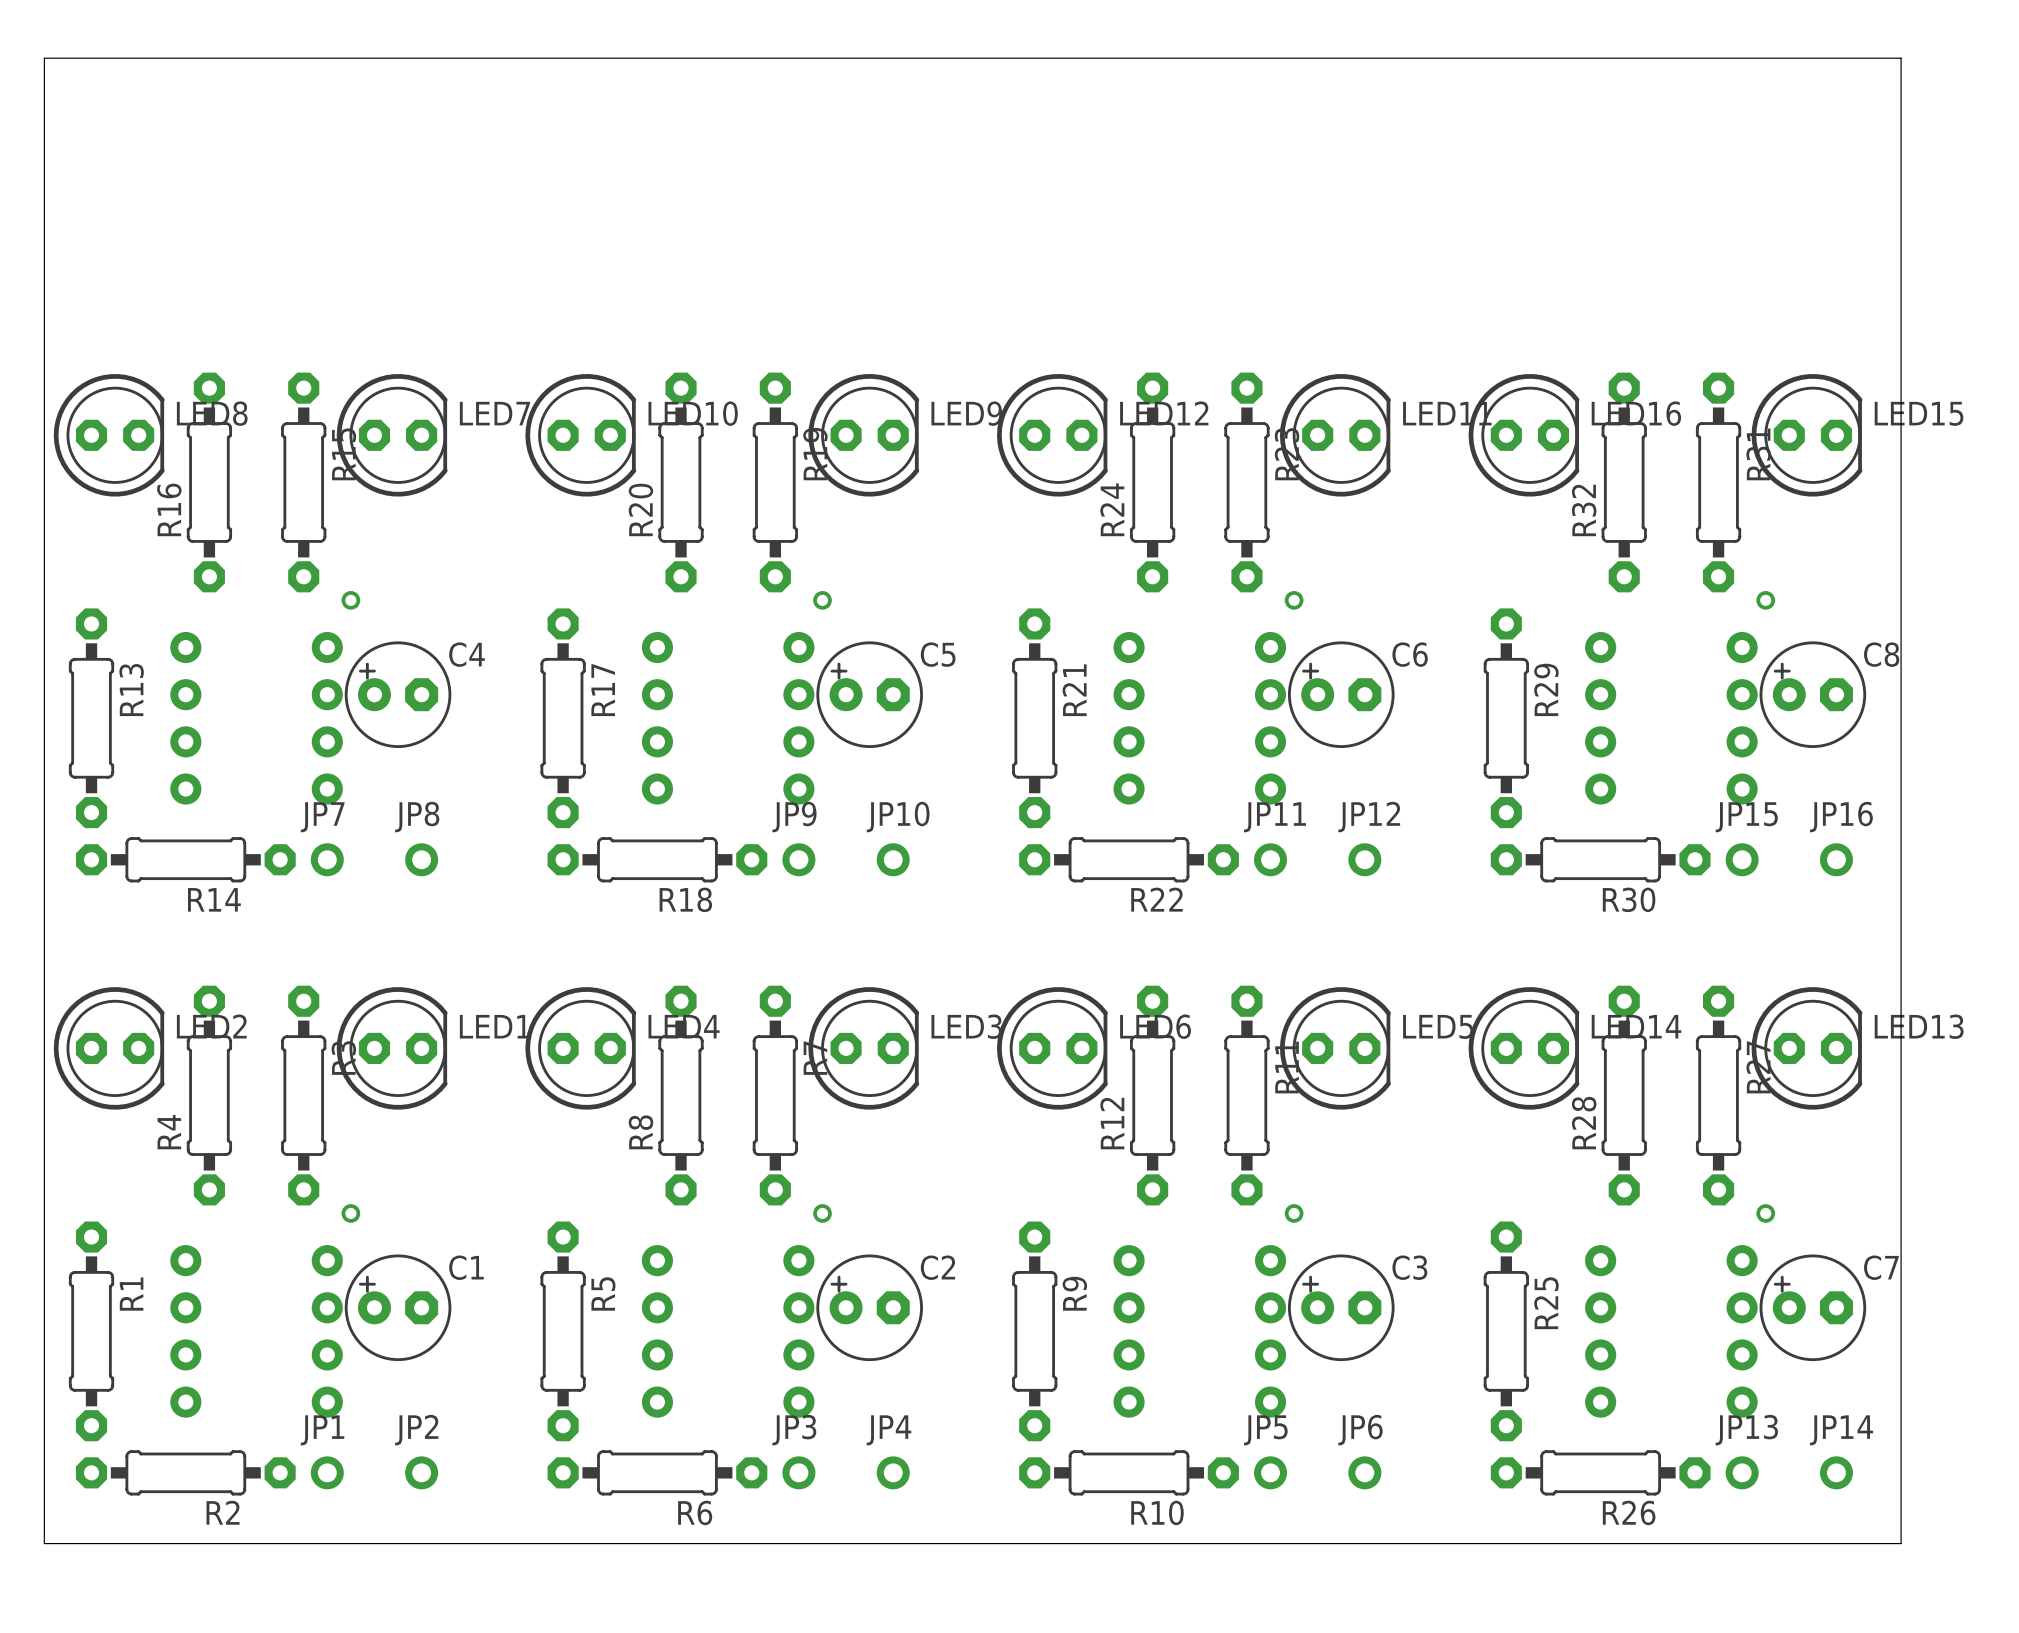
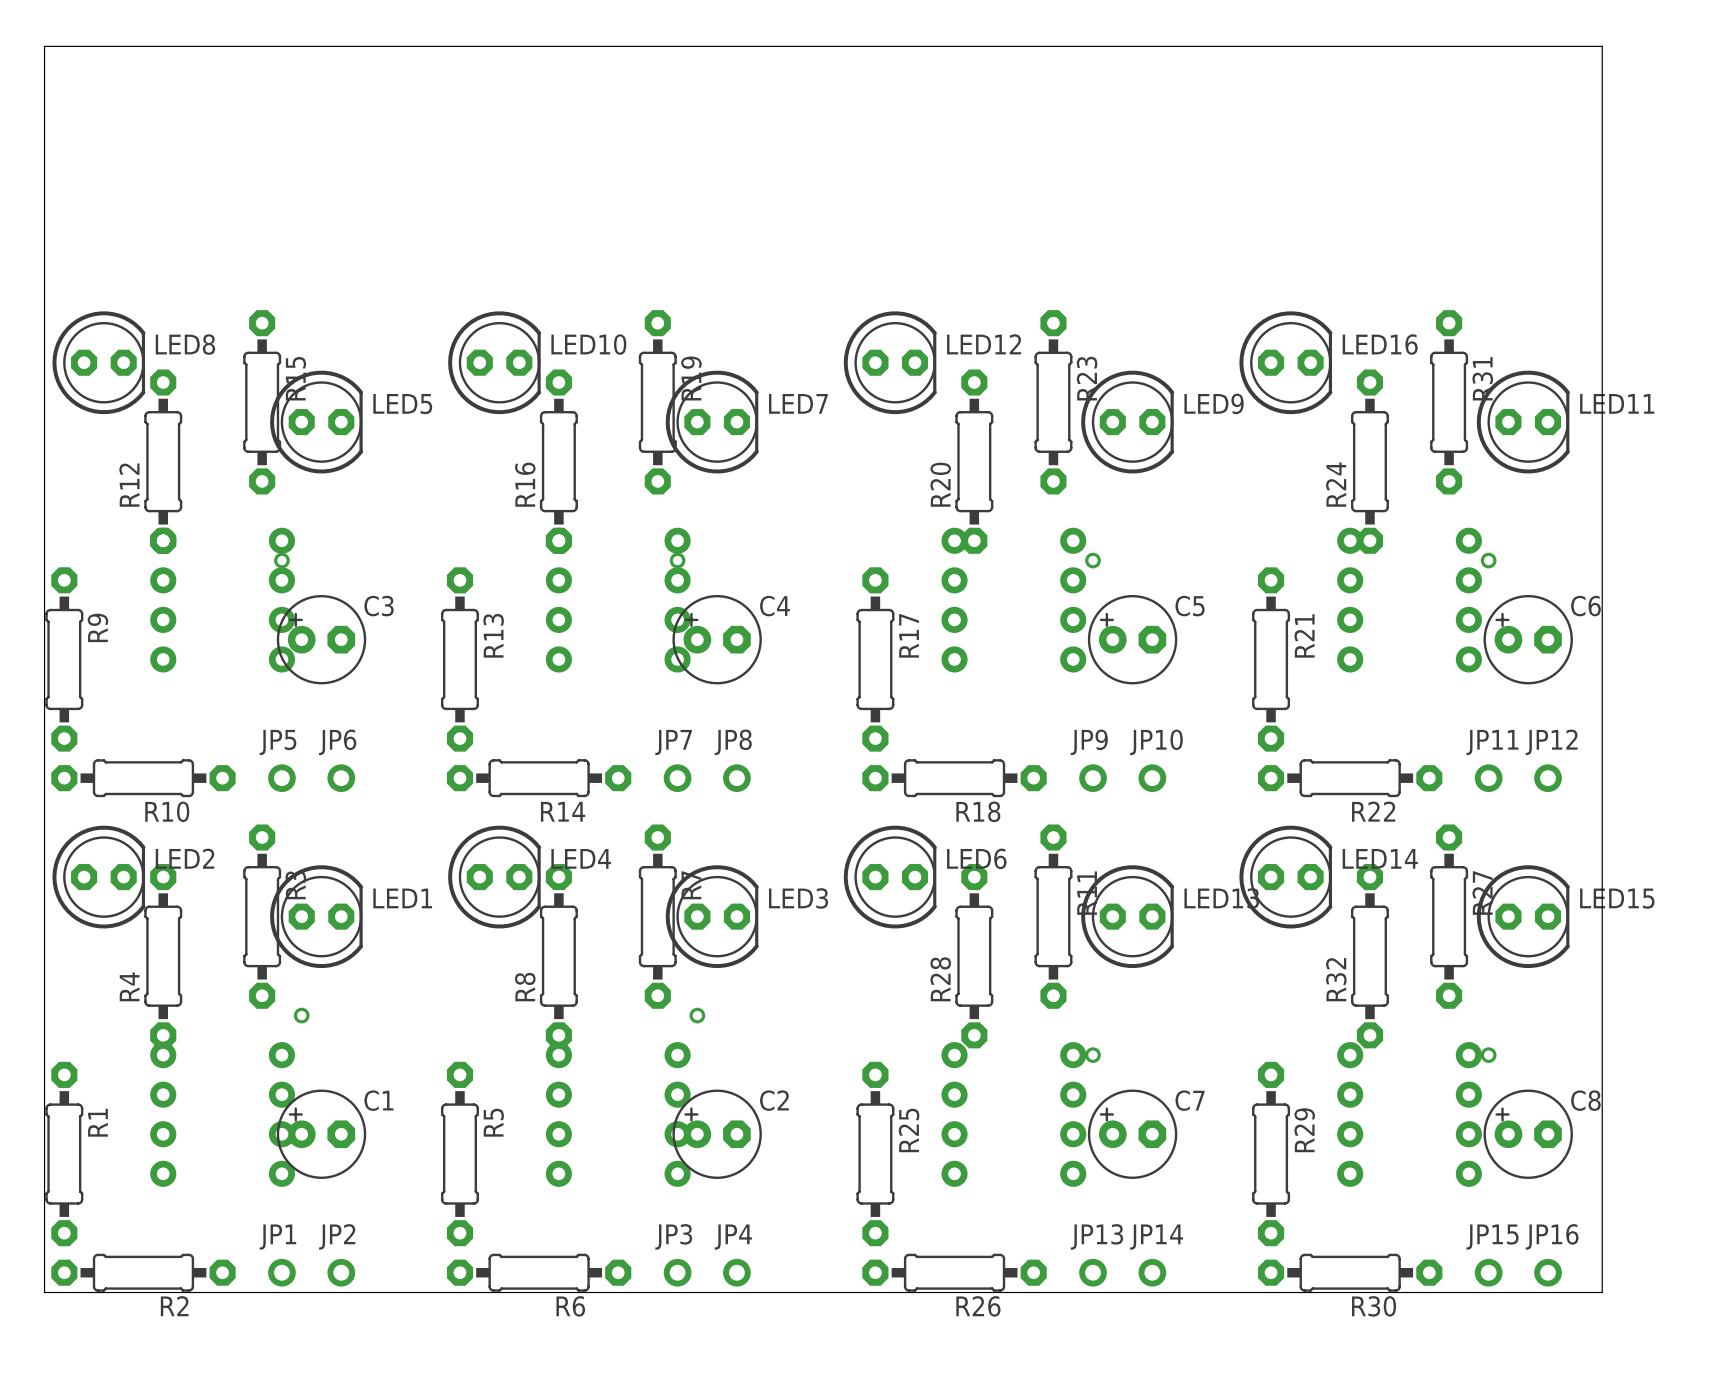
LED7 position: (392, 435) -> (712, 422)
LED9 position: (863, 435) -> (1127, 422)
LED11 position: (1335, 435) -> (1523, 422)
LED15 position: (1806, 435) -> (1523, 916)
R16 position: (209, 482) -> (558, 461)
R20 position: (681, 482) -> (974, 461)
R24 position: (1152, 482) -> (1369, 461)
R32 position: (1624, 482) -> (1369, 956)
via position: (350, 600) -> (281, 560)
via position: (822, 600) -> (677, 560)
via position: (1294, 600) -> (1093, 560)
via position: (1765, 600) -> (1488, 560)
C4 position: (398, 694) -> (717, 639)
C5 position: (869, 694) -> (1132, 639)
C6 position: (1341, 694) -> (1528, 639)
C8 position: (1812, 694) -> (1528, 1134)
R13 position: (91, 718) -> (459, 659)
R17 position: (563, 718) -> (875, 659)
R21 position: (1034, 718) -> (1271, 659)
R29 position: (1506, 718) -> (1271, 1154)
R14 position: (185, 859) -> (539, 778)
JP7 position: (327, 859) -> (677, 778)
JP8 position: (421, 859) -> (736, 778)
R18 position: (657, 859) -> (954, 778)
JP9 position: (798, 859) -> (1093, 778)
JP10 position: (893, 859) -> (1152, 778)
R22 position: (1129, 859) -> (1350, 778)
JP11 position: (1270, 859) -> (1488, 778)
JP12 position: (1364, 859) -> (1548, 778)
R30 position: (1600, 859) -> (1350, 1272)
JP15 position: (1742, 859) -> (1488, 1272)
JP16 position: (1836, 859) -> (1548, 1272)
LED1 position: (392, 1048) -> (316, 916)
LED3 position: (863, 1048) -> (712, 916)
LED5 position: (1335, 1048) -> (316, 422)
LED13 position: (1806, 1048) -> (1127, 916)
R4 position: (209, 1095) -> (163, 956)
R8 position: (681, 1095) -> (558, 956)
R12 position: (1152, 1095) -> (163, 461)
R28 position: (1624, 1095) -> (974, 956)
via position: (1294, 1213) -> (1093, 1055)
via position: (1765, 1213) -> (1488, 1055)
C1 position: (398, 1307) -> (321, 1134)
C2 position: (869, 1307) -> (717, 1134)
C3 position: (1341, 1307) -> (321, 639)
C7 position: (1812, 1307) -> (1132, 1134)
R1 position: (91, 1331) -> (64, 1154)
R5 position: (563, 1331) -> (459, 1154)
R9 position: (1034, 1331) -> (64, 659)
R25 position: (1506, 1331) -> (875, 1154)
R2 position: (185, 1472) -> (143, 1272)
JP1 position: (327, 1472) -> (281, 1272)
JP2 position: (421, 1472) -> (341, 1272)
R6 position: (657, 1472) -> (539, 1272)
JP3 position: (798, 1472) -> (677, 1272)
JP4 position: (893, 1472) -> (736, 1272)
R10 position: (1129, 1472) -> (143, 778)
JP5 position: (1270, 1472) -> (281, 778)
JP6 position: (1364, 1472) -> (341, 778)
R26 position: (1600, 1472) -> (954, 1272)
JP13 position: (1742, 1472) -> (1093, 1272)
JP14 position: (1836, 1472) -> (1152, 1272)

